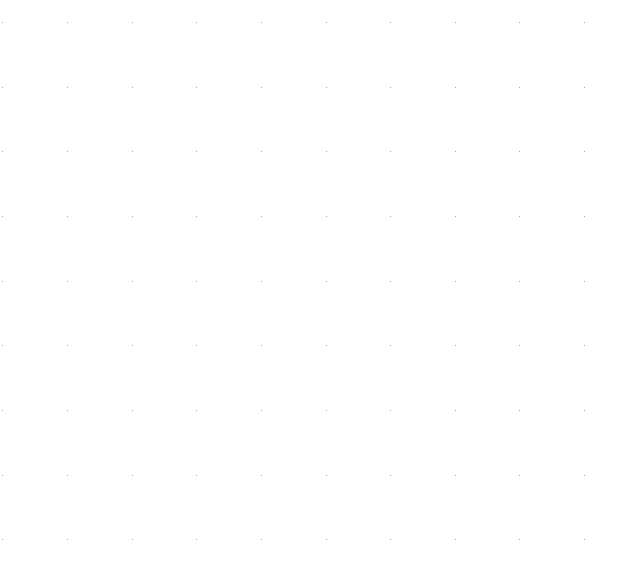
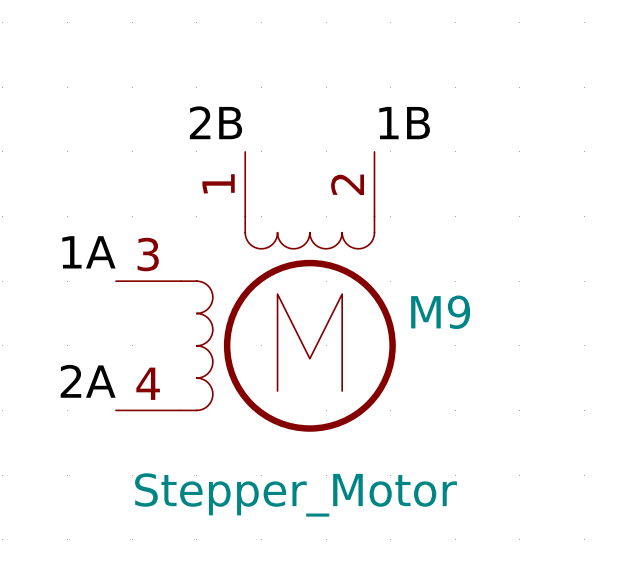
label: none -> 2B (215, 122)
label: none -> 1B (404, 123)
label: none -> 1A (88, 252)
M9: none -> Stepper_Motor (255, 291)
label: none -> 2A (88, 381)

